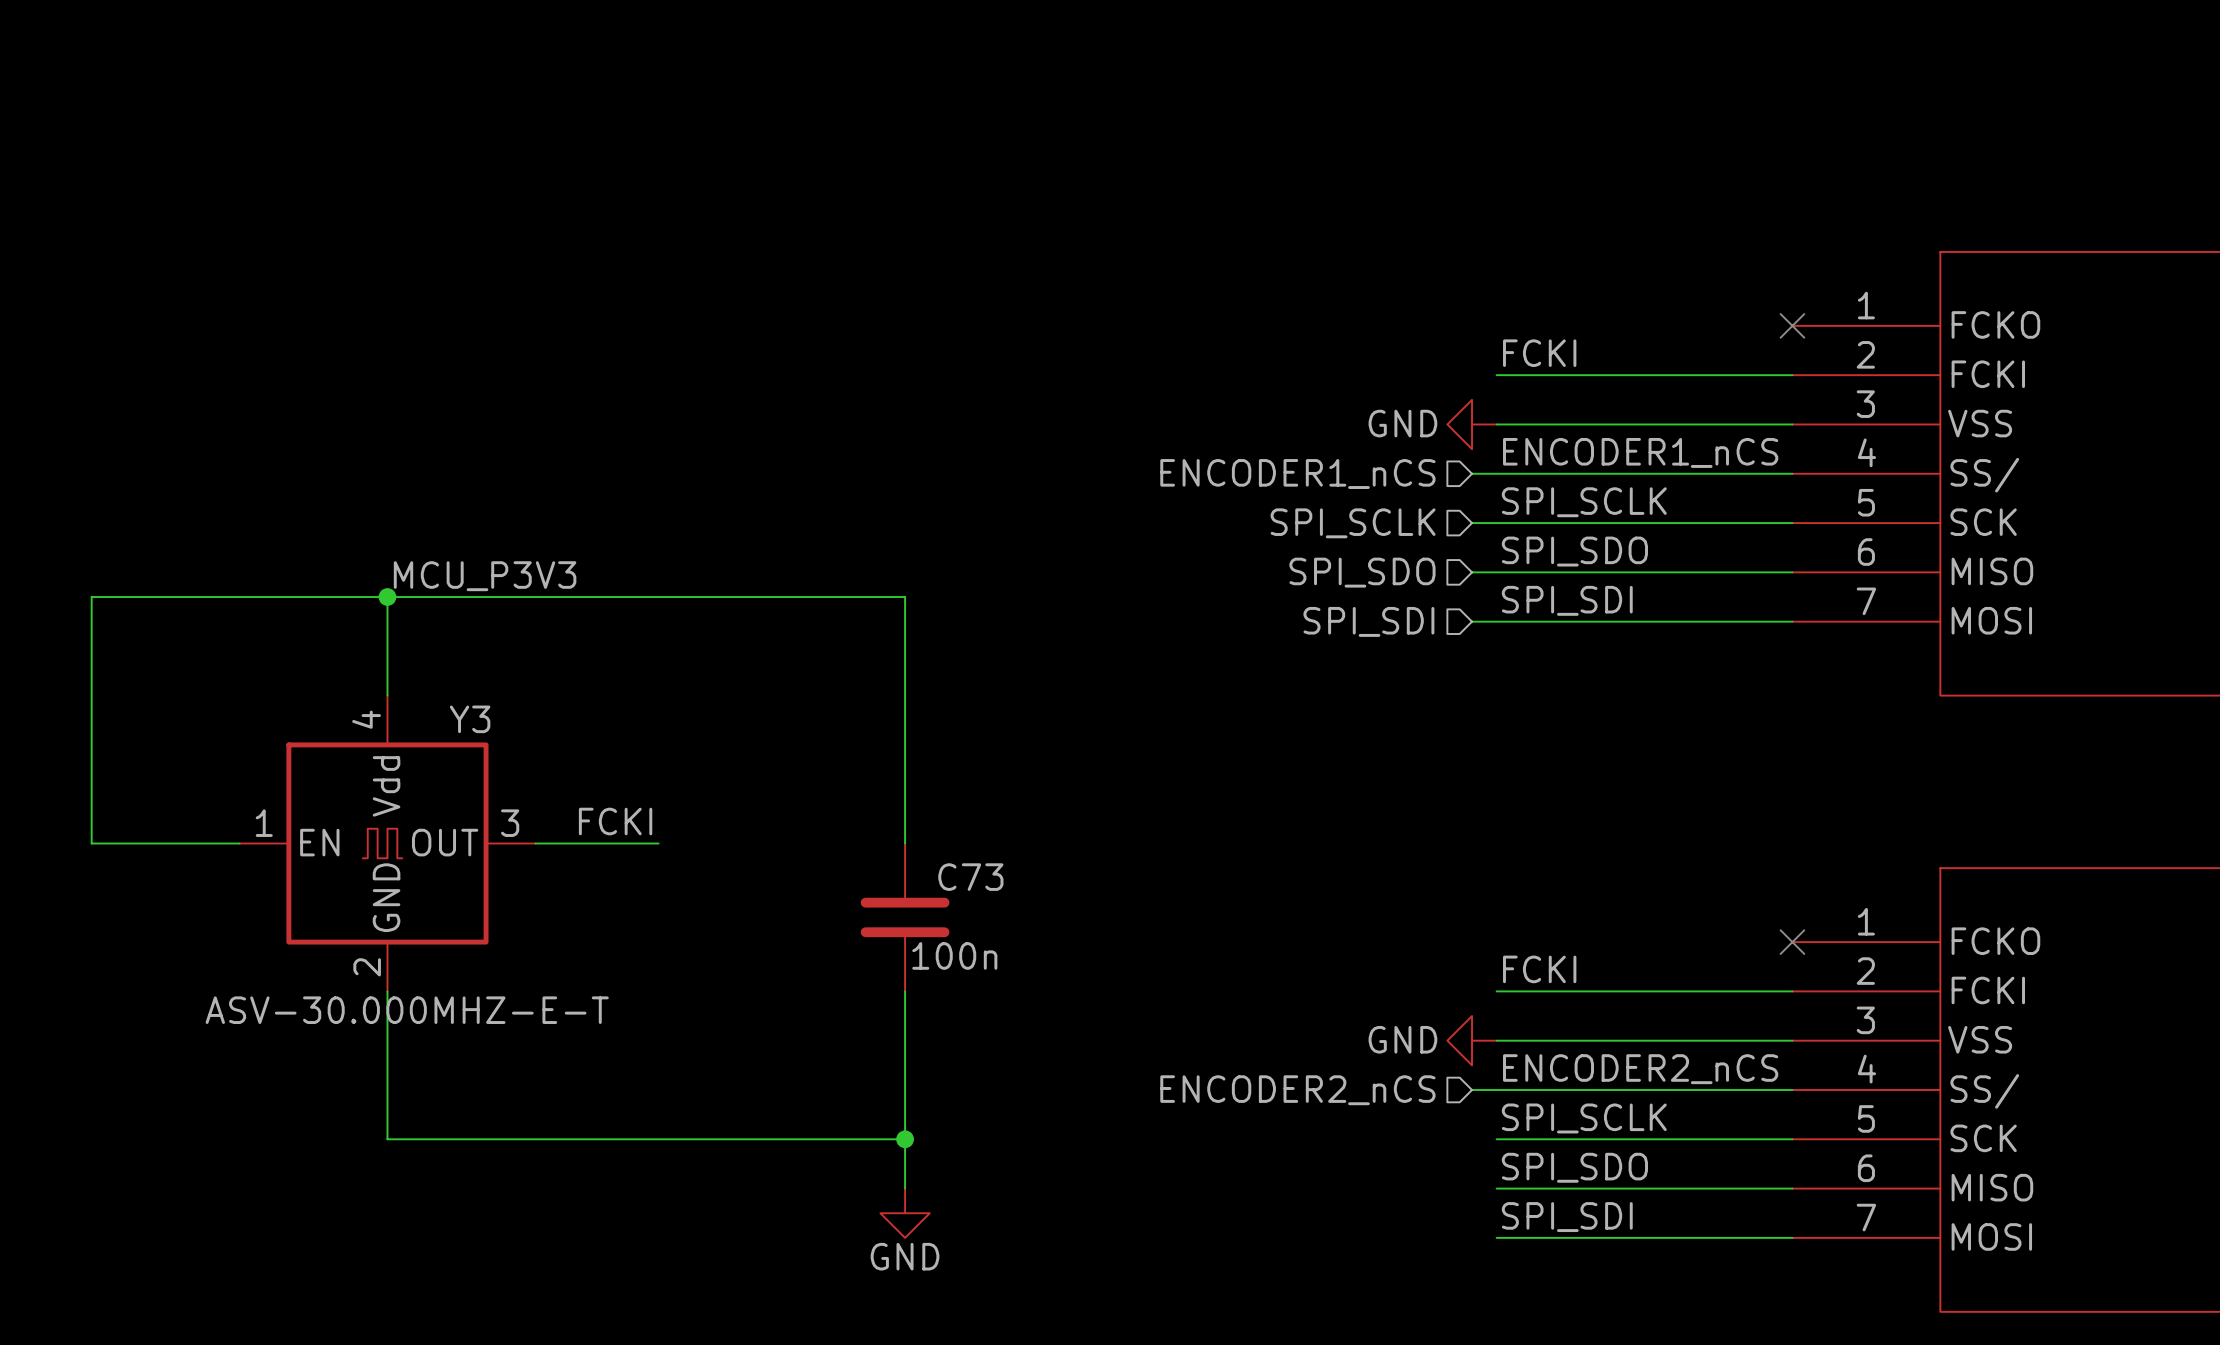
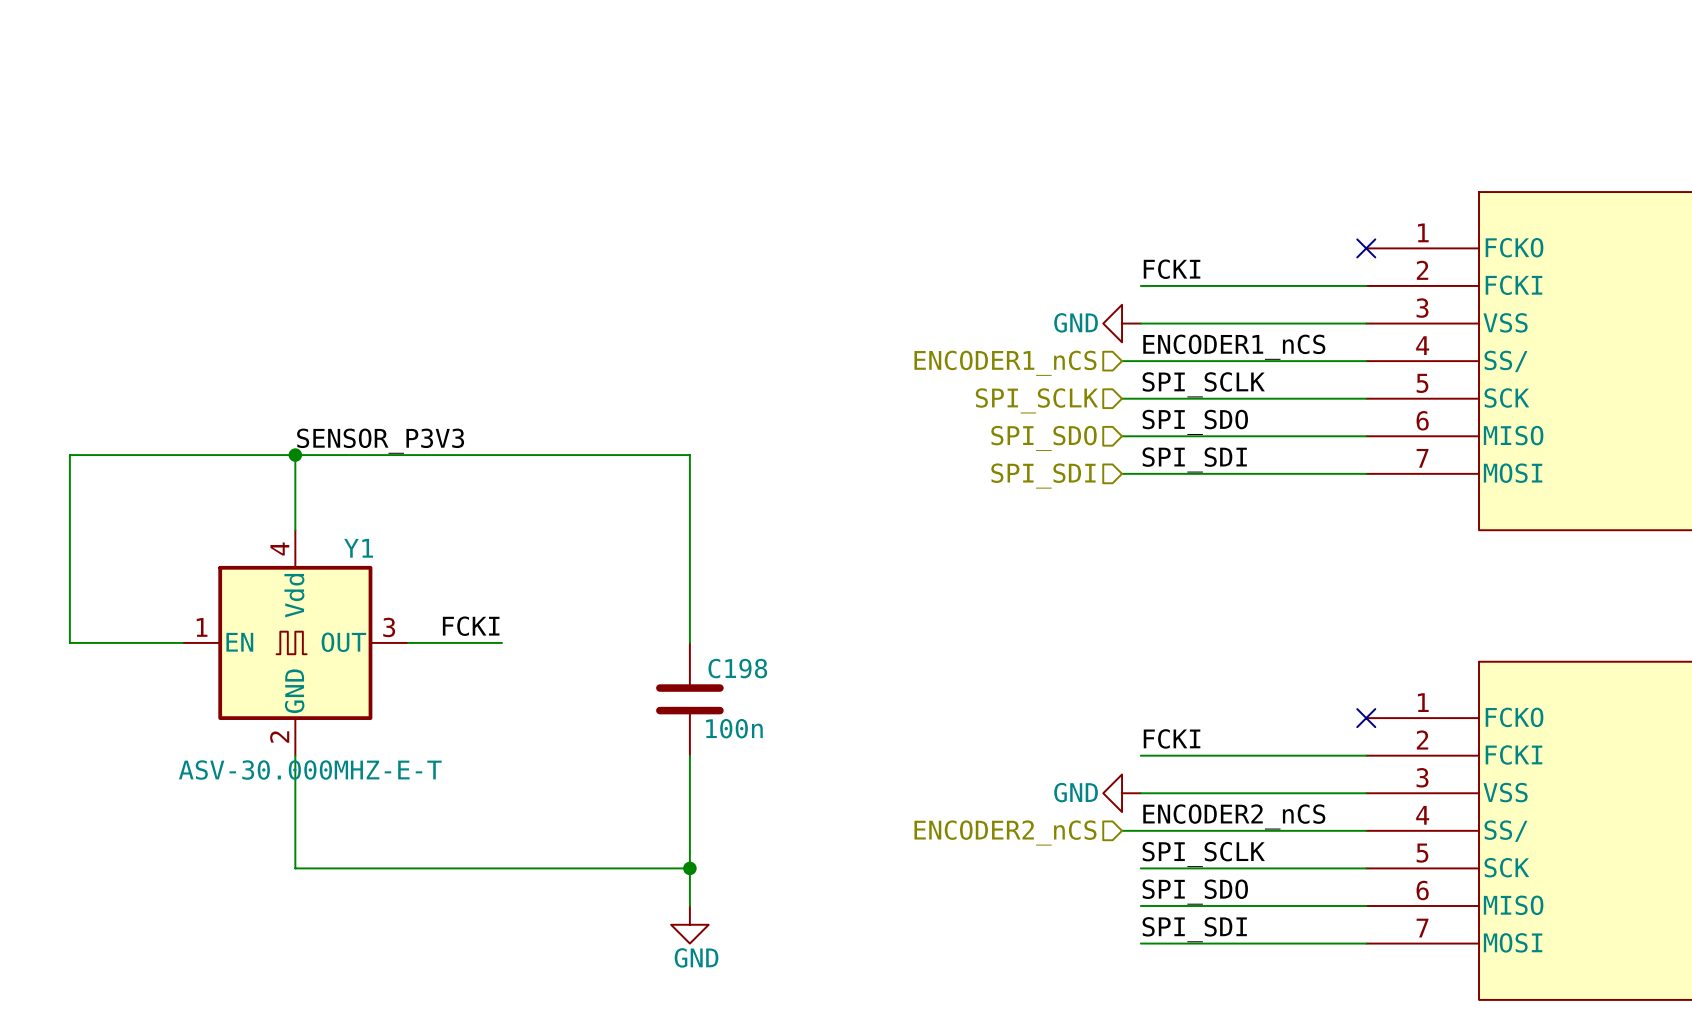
label: MCU_P3V3 (485, 576) -> SENSOR_P3V3 (380, 441)
Y3 name: Y3 (470, 719) -> Y1 (358, 548)
C73 name: C73 (970, 877) -> C198 (737, 668)

